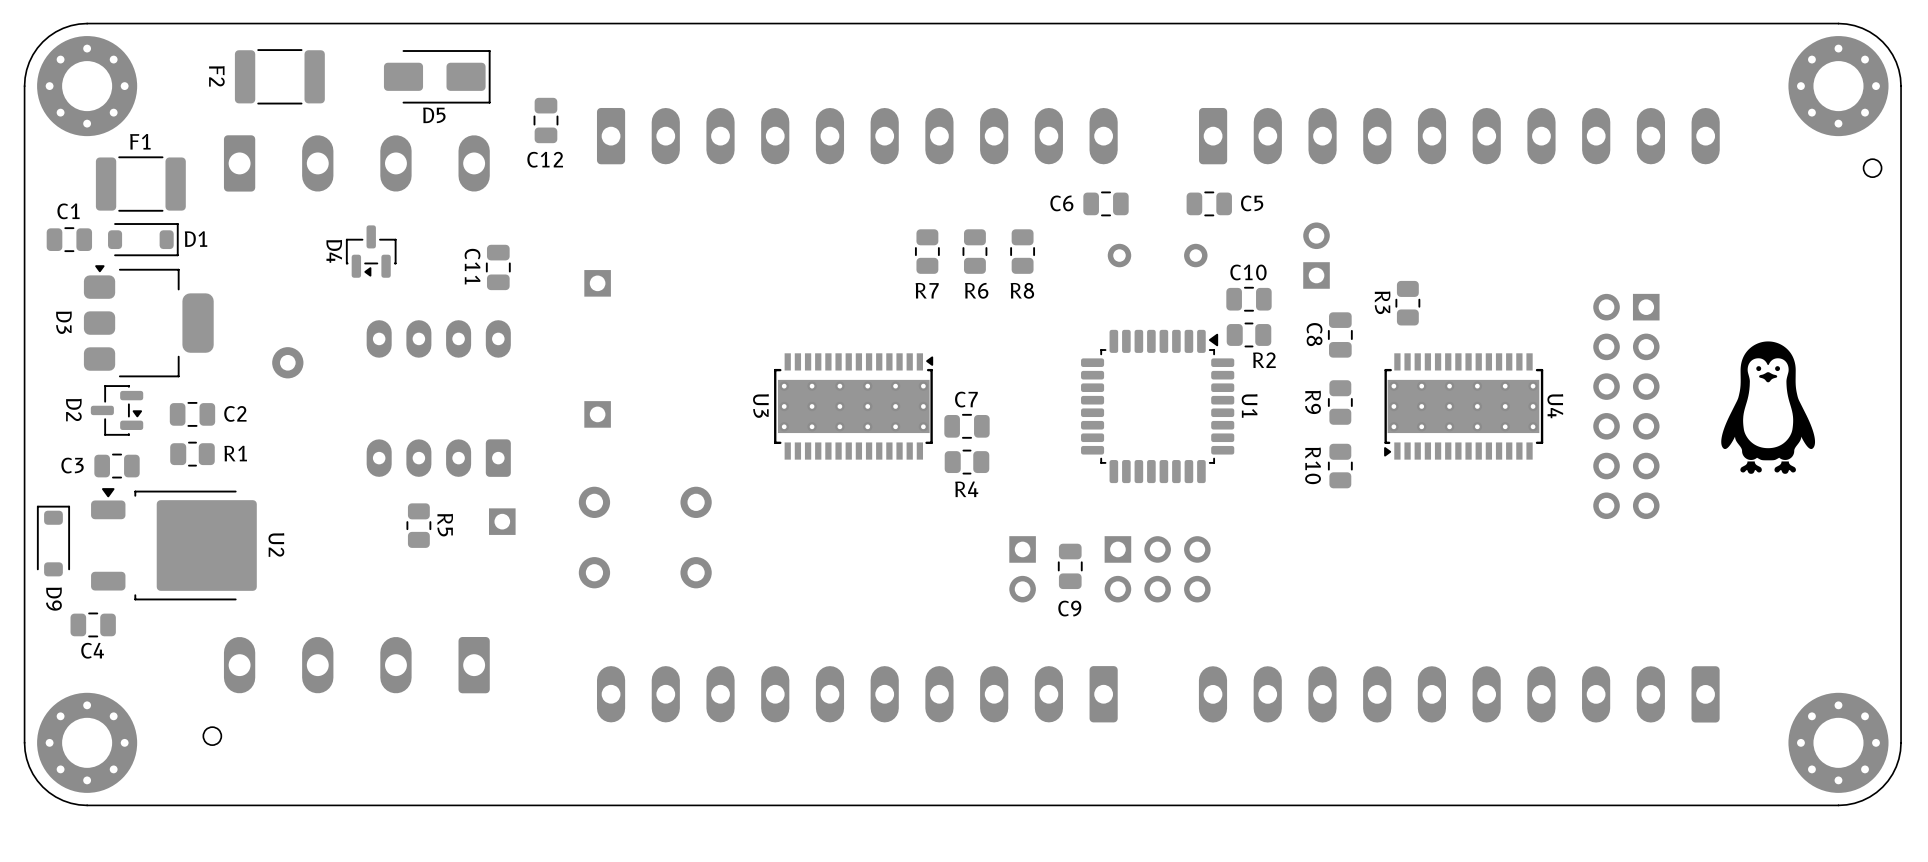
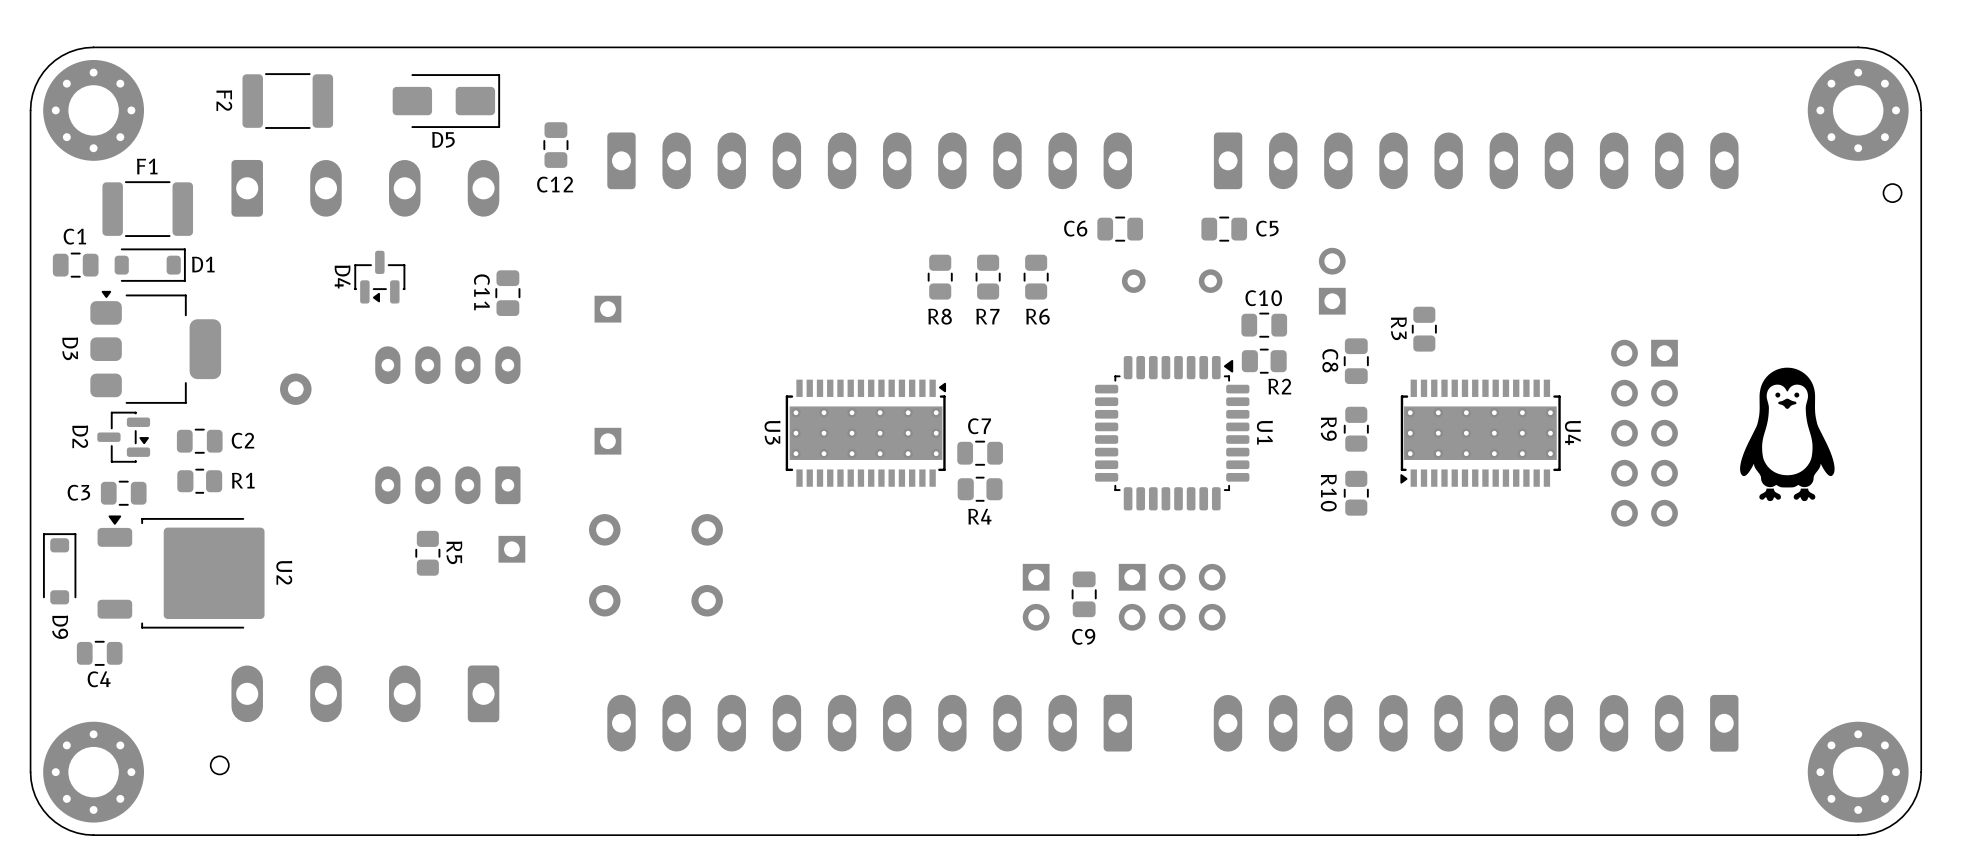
R7 name: R7 (927, 290) -> R8 (940, 316)
R6 name: R6 (976, 290) -> R7 (987, 316)
R8 name: R8 (1022, 290) -> R6 (1037, 316)
part footprint: [1593, 293, 1660, 520] -> [1611, 339, 1678, 527]

